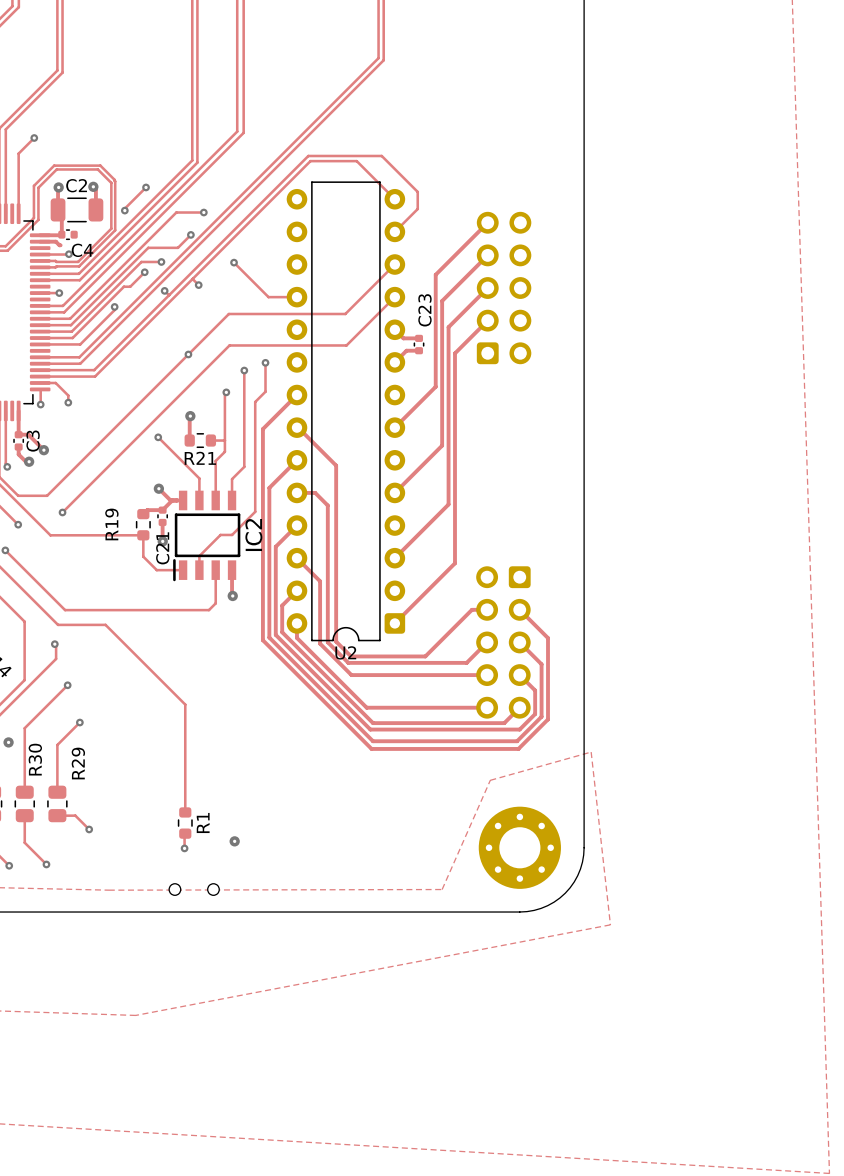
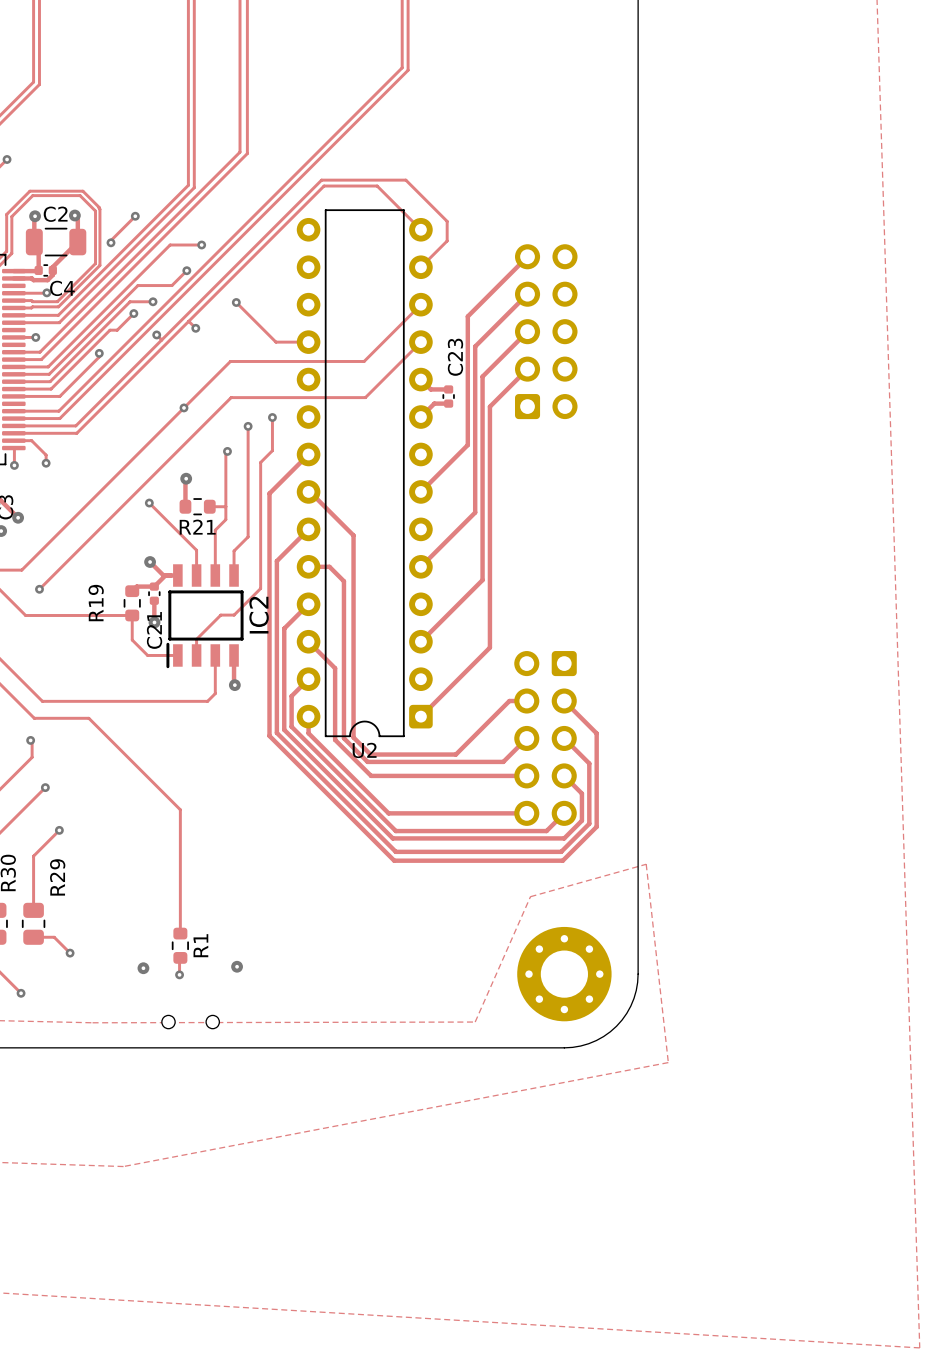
track: (57, 243) (60, 245) -> (33, 280) (47, 280) (52, 275) (52, 267) (77, 242)
via: none -> (143, 968)

